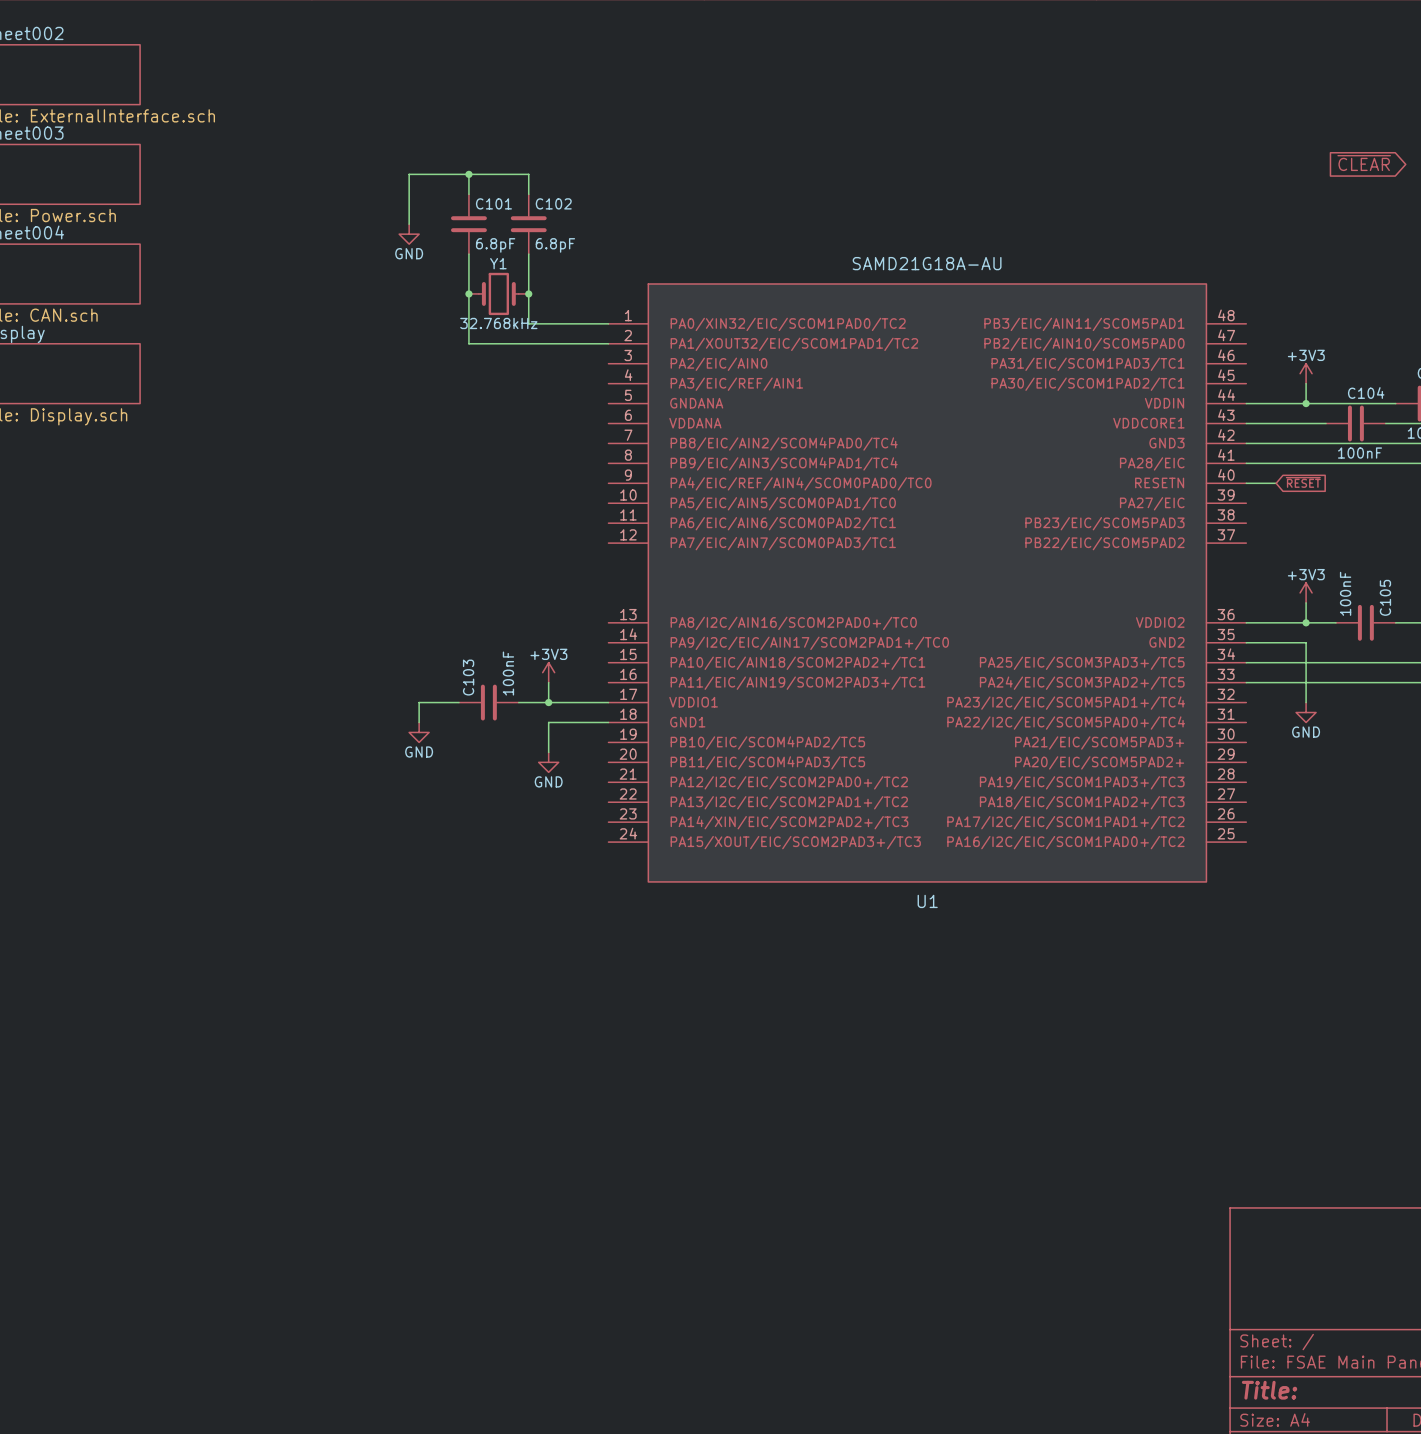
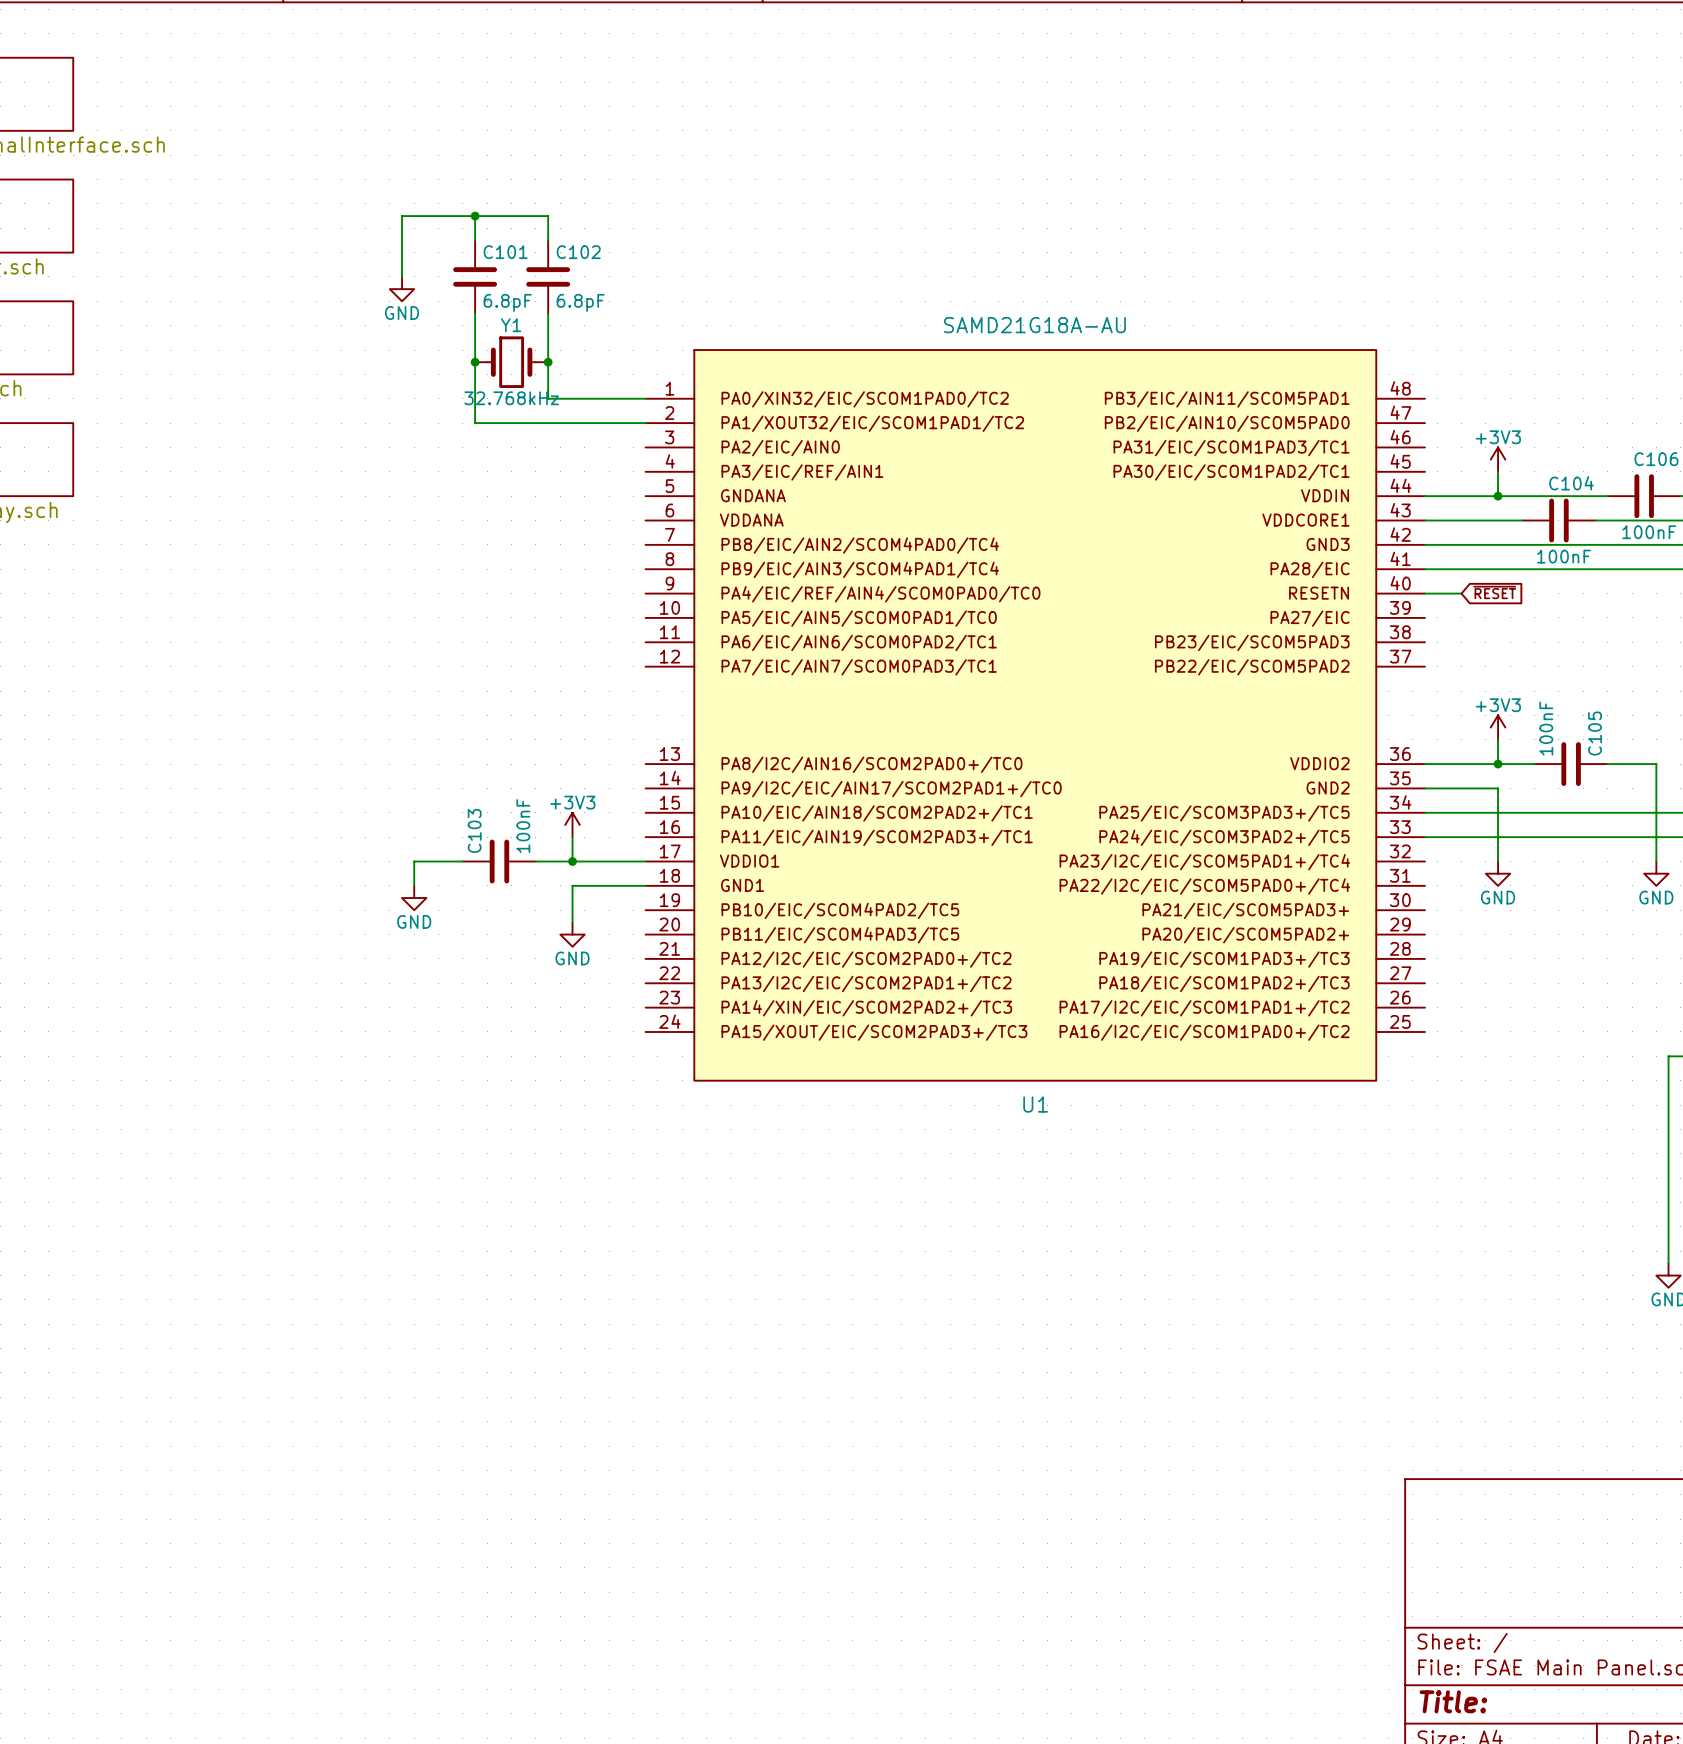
global label: ~{CLEAR} (1364, 163) -> none

